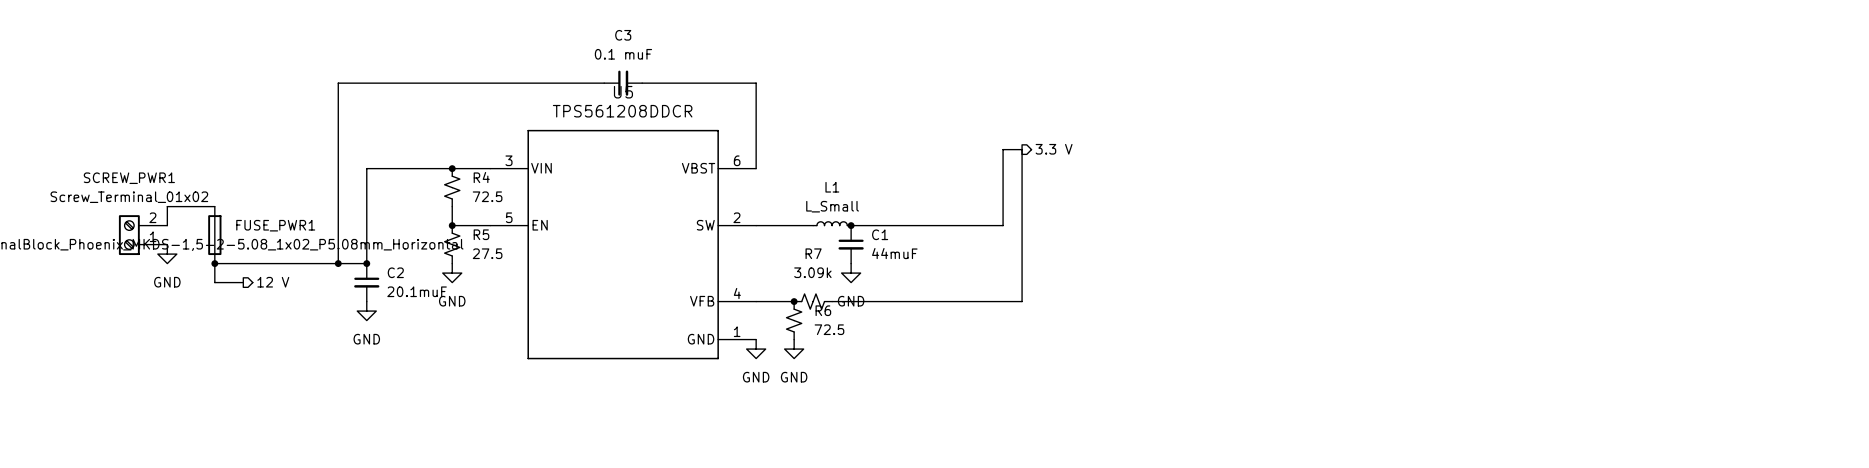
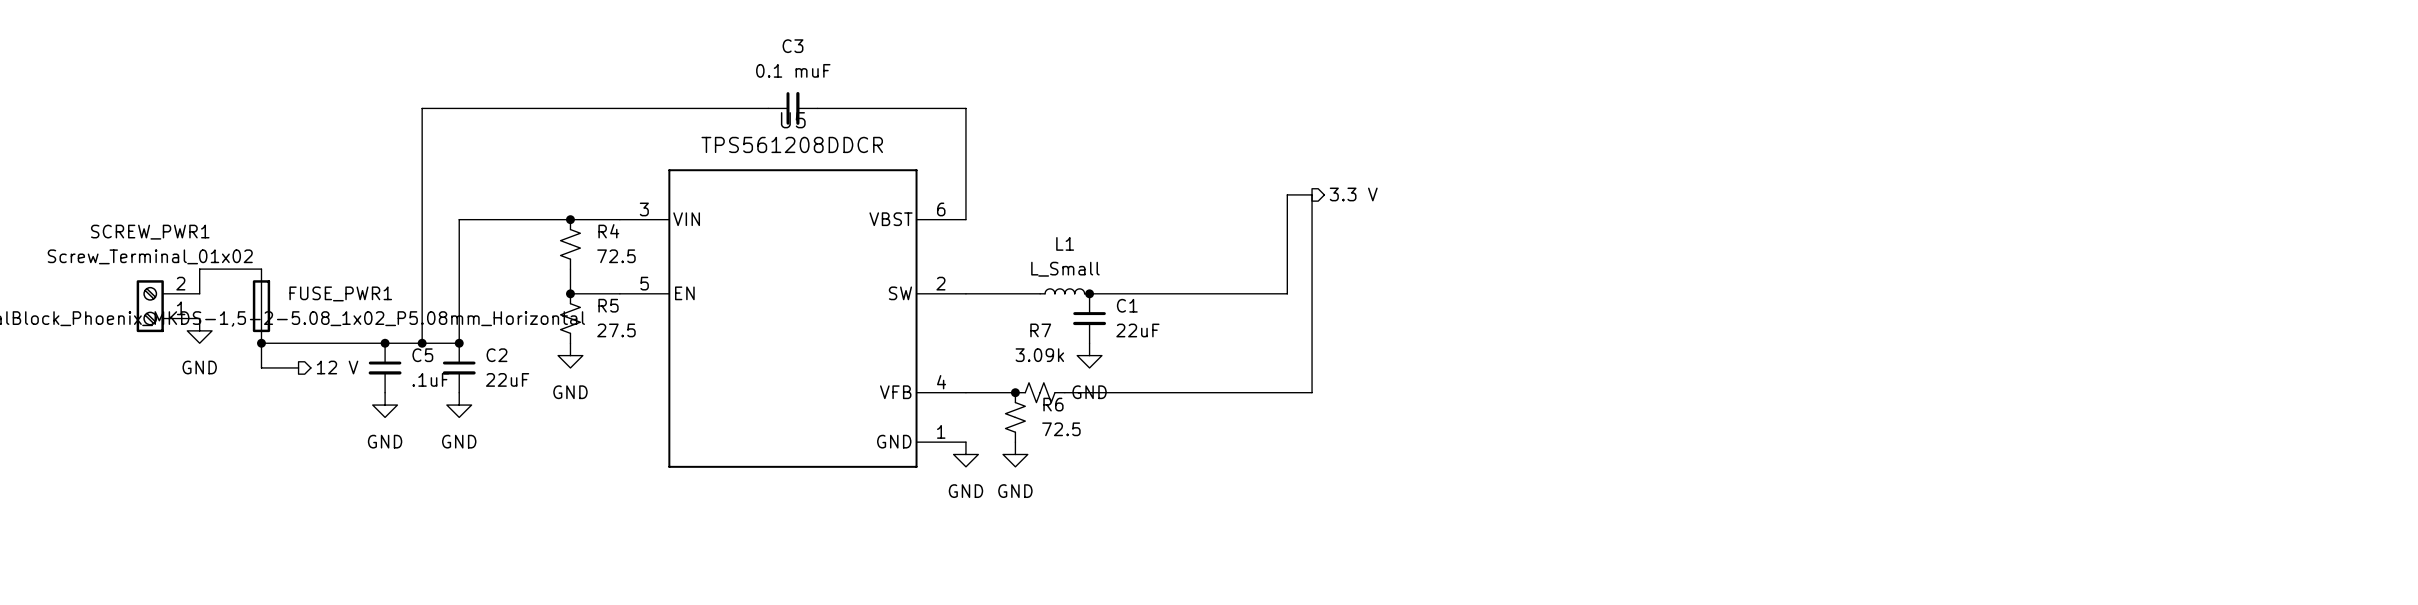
C1 value: 44muF (894, 253) -> 22uF (1137, 330)
junction: none -> (385, 343)
C5: none -> .1uF (385, 367)
C2 value: 20.1muF (417, 291) -> 22uF (507, 379)
power symbol: none -> GND (385, 405)

